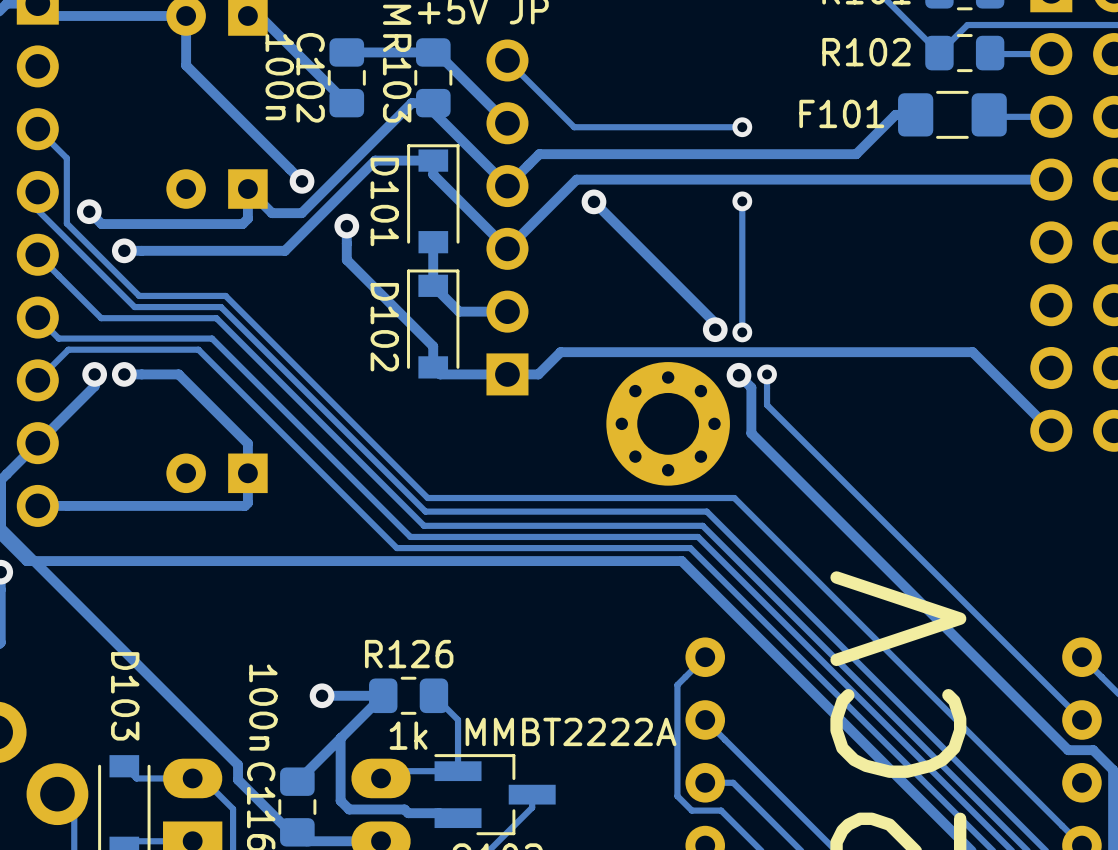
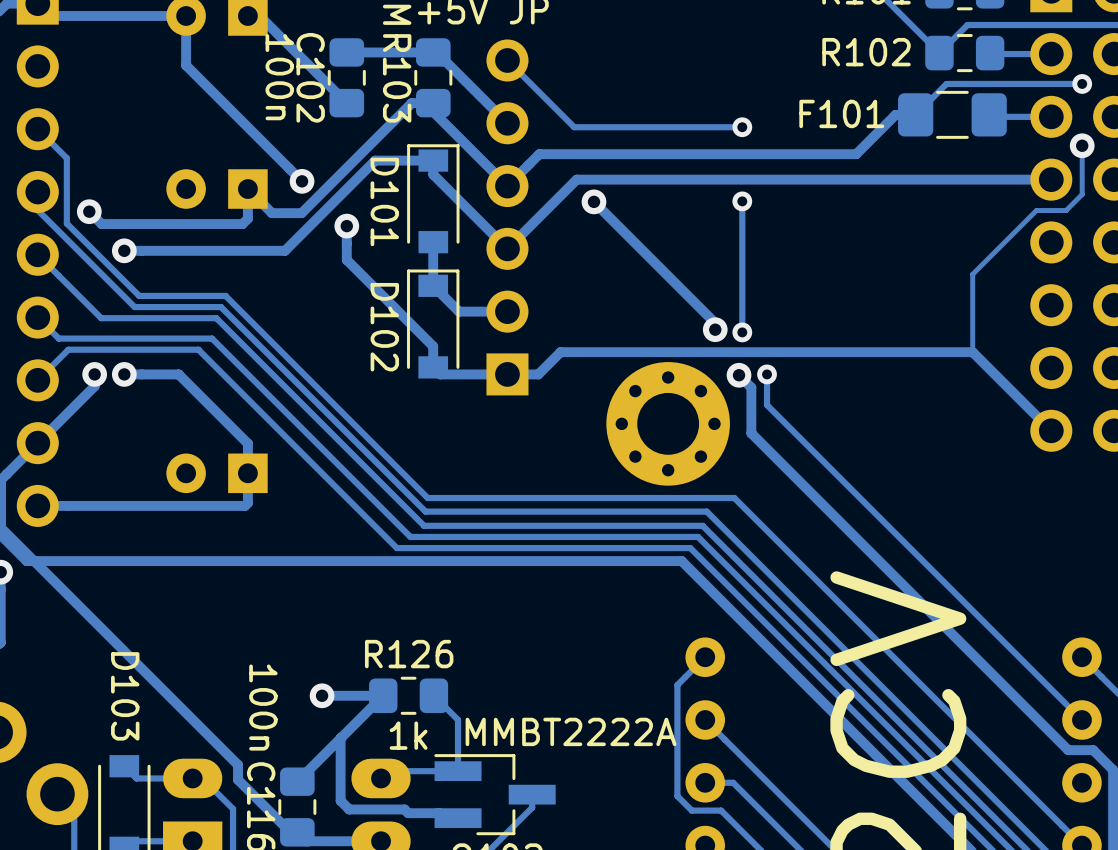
track: none -> (1082, 83) (946, 83) (915, 114)
via: none -> (1082, 83)
track: none -> (1082, 145) (1082, 194) (1066, 210) (1036, 210) (972, 274) (972, 352)
via: none -> (1082, 145)

